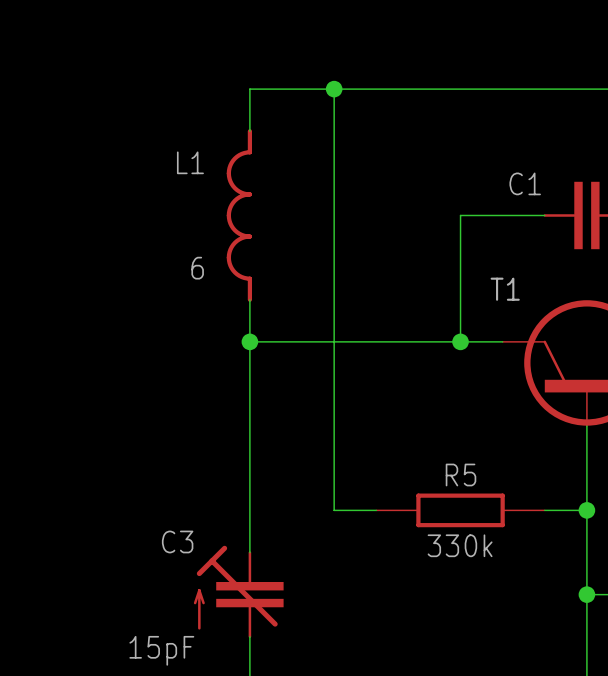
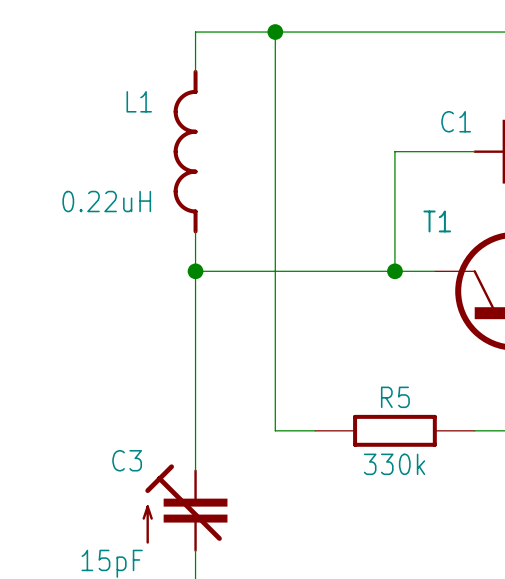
L1 value: 6 (197, 268) -> 0.22uH (106, 201)

